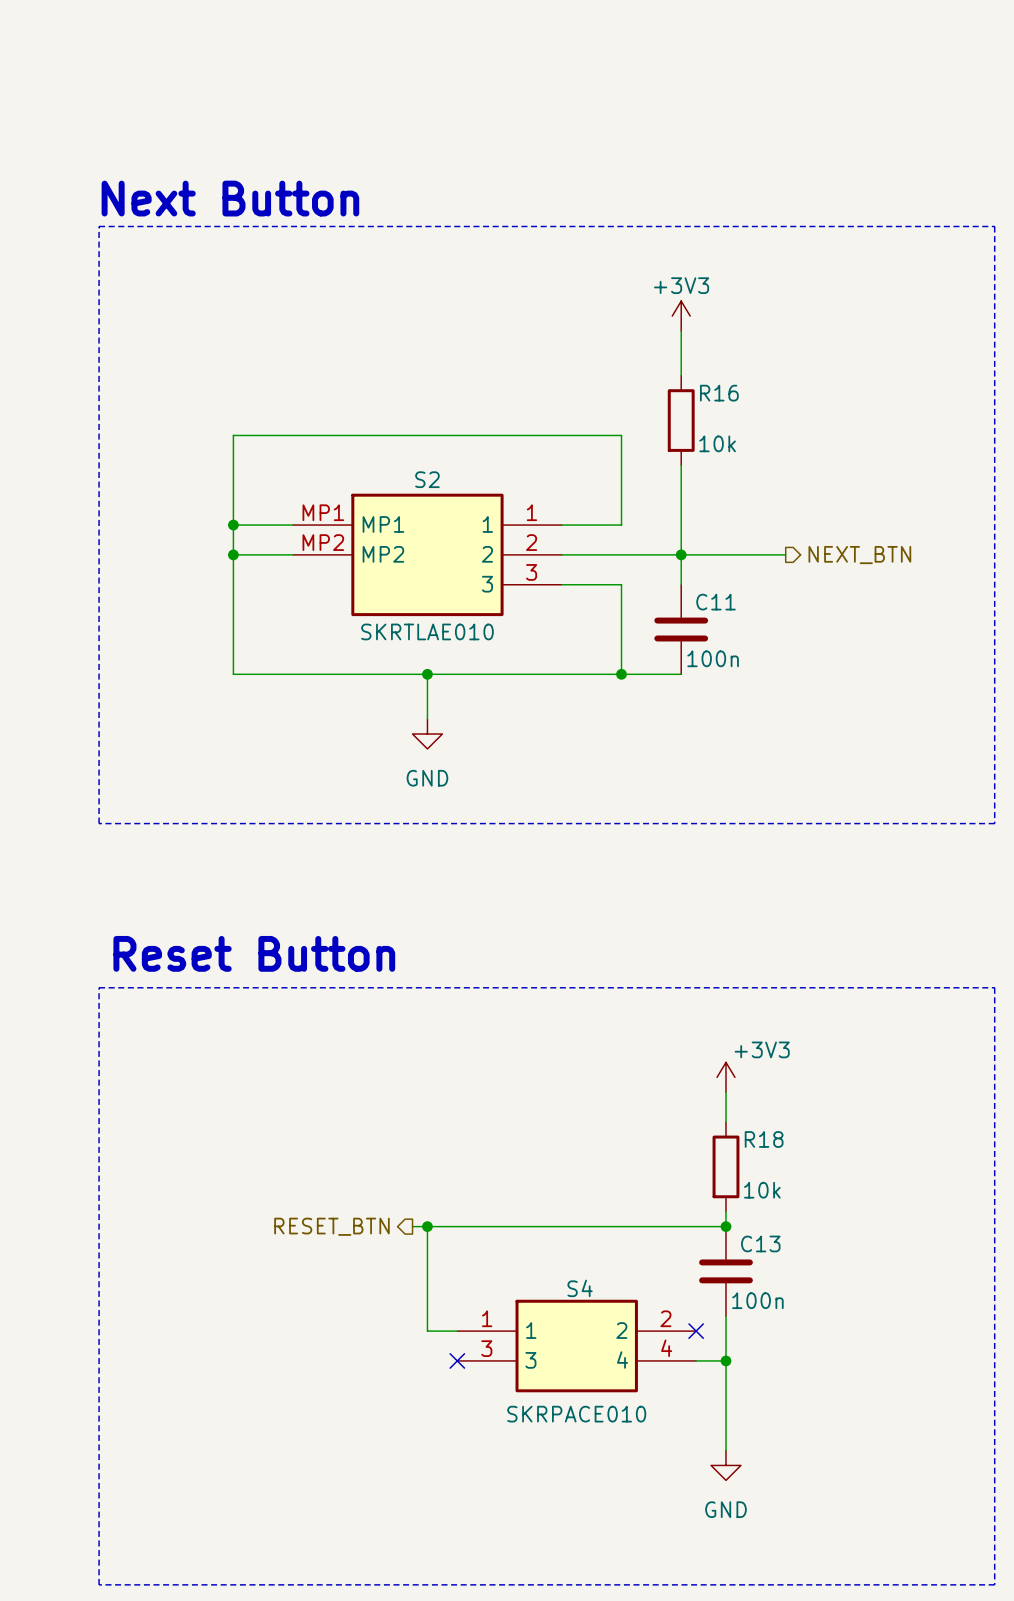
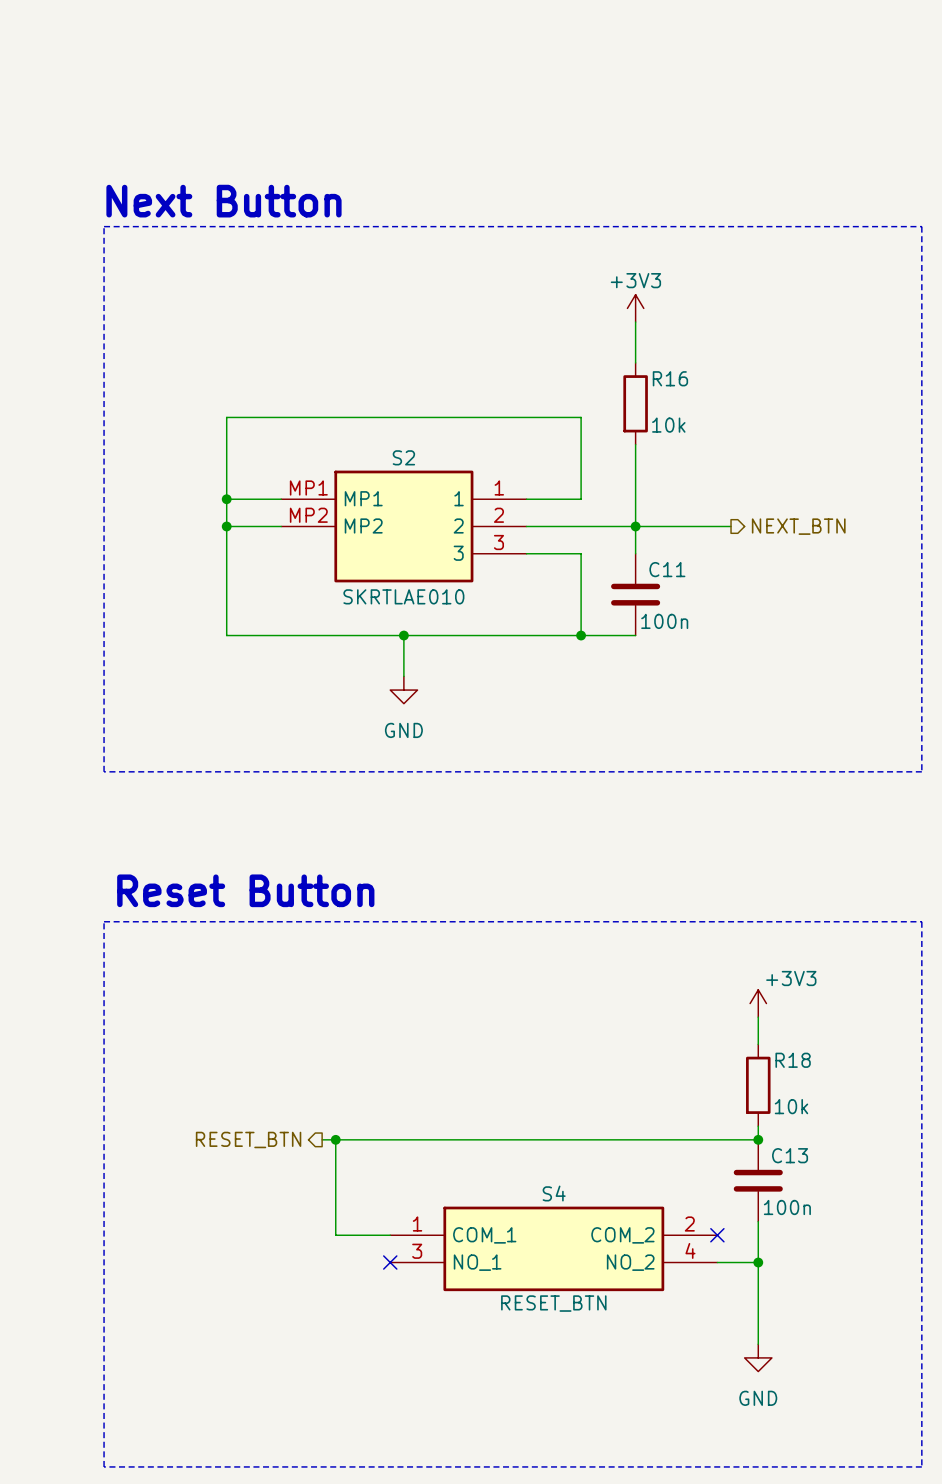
power symbol position: +3V3 (725, 1077) -> +3V3 (758, 1003)
wire: (725, 1092) (725, 1122) -> (758, 1017) (758, 1044)
R18 position: (725, 1166) -> (758, 1085)
wire: (725, 1211) (725, 1226) -> (758, 1126) (758, 1139) (676, 1139)
hierarchical label position: RESET_BTN (331, 1226) -> RESET_BTN (248, 1139)
wire: none -> (322, 1139) (390, 1139)
wire: none -> (335, 1139) (335, 1235) (390, 1235)
junction: none -> (335, 1139)
wire: (427, 1226) (427, 1331) (457, 1331) -> none
junction: (427, 1226) -> none
junction: (725, 1226) -> none
junction: none -> (758, 1139)
C13 position: (725, 1271) -> (758, 1180)
S4 symbol: [457, 1299, 697, 1393] -> [390, 1206, 718, 1292]
wire: (725, 1316) (725, 1450) -> (758, 1221) (758, 1344)
no-connect mark: (696, 1331) -> none
no-connect mark: none -> (717, 1235)
no-connect mark position: (457, 1360) -> (390, 1262)
junction: (725, 1360) -> none
wire: none -> (717, 1262) (758, 1262)
junction: none -> (758, 1262)
S4 value: SKRPACE010 (576, 1414) -> RESET_BTN (553, 1303)
power symbol position: GND (725, 1465) -> GND (758, 1357)

